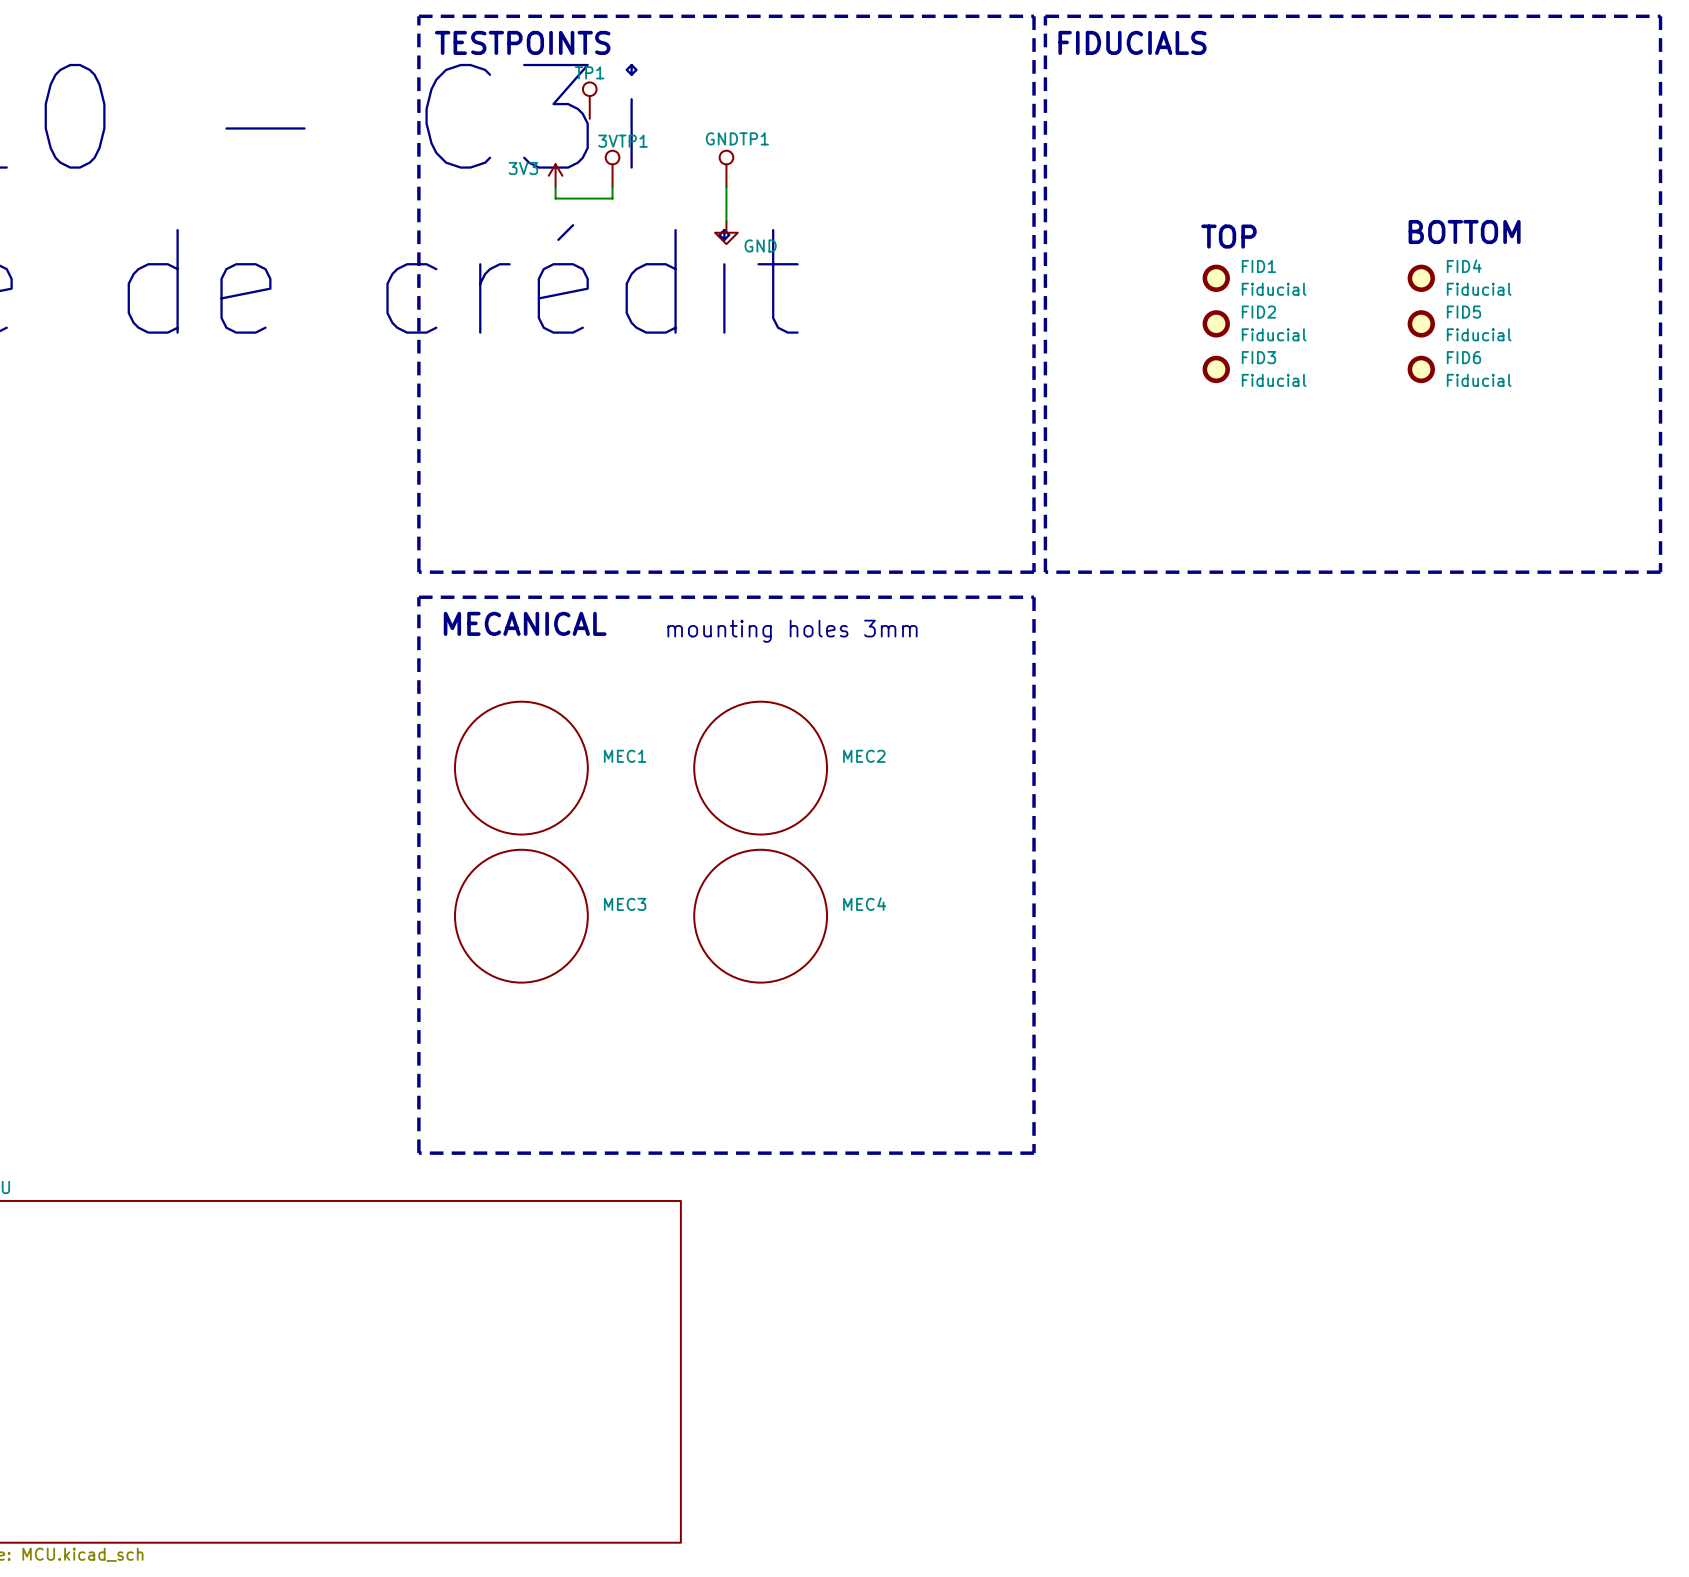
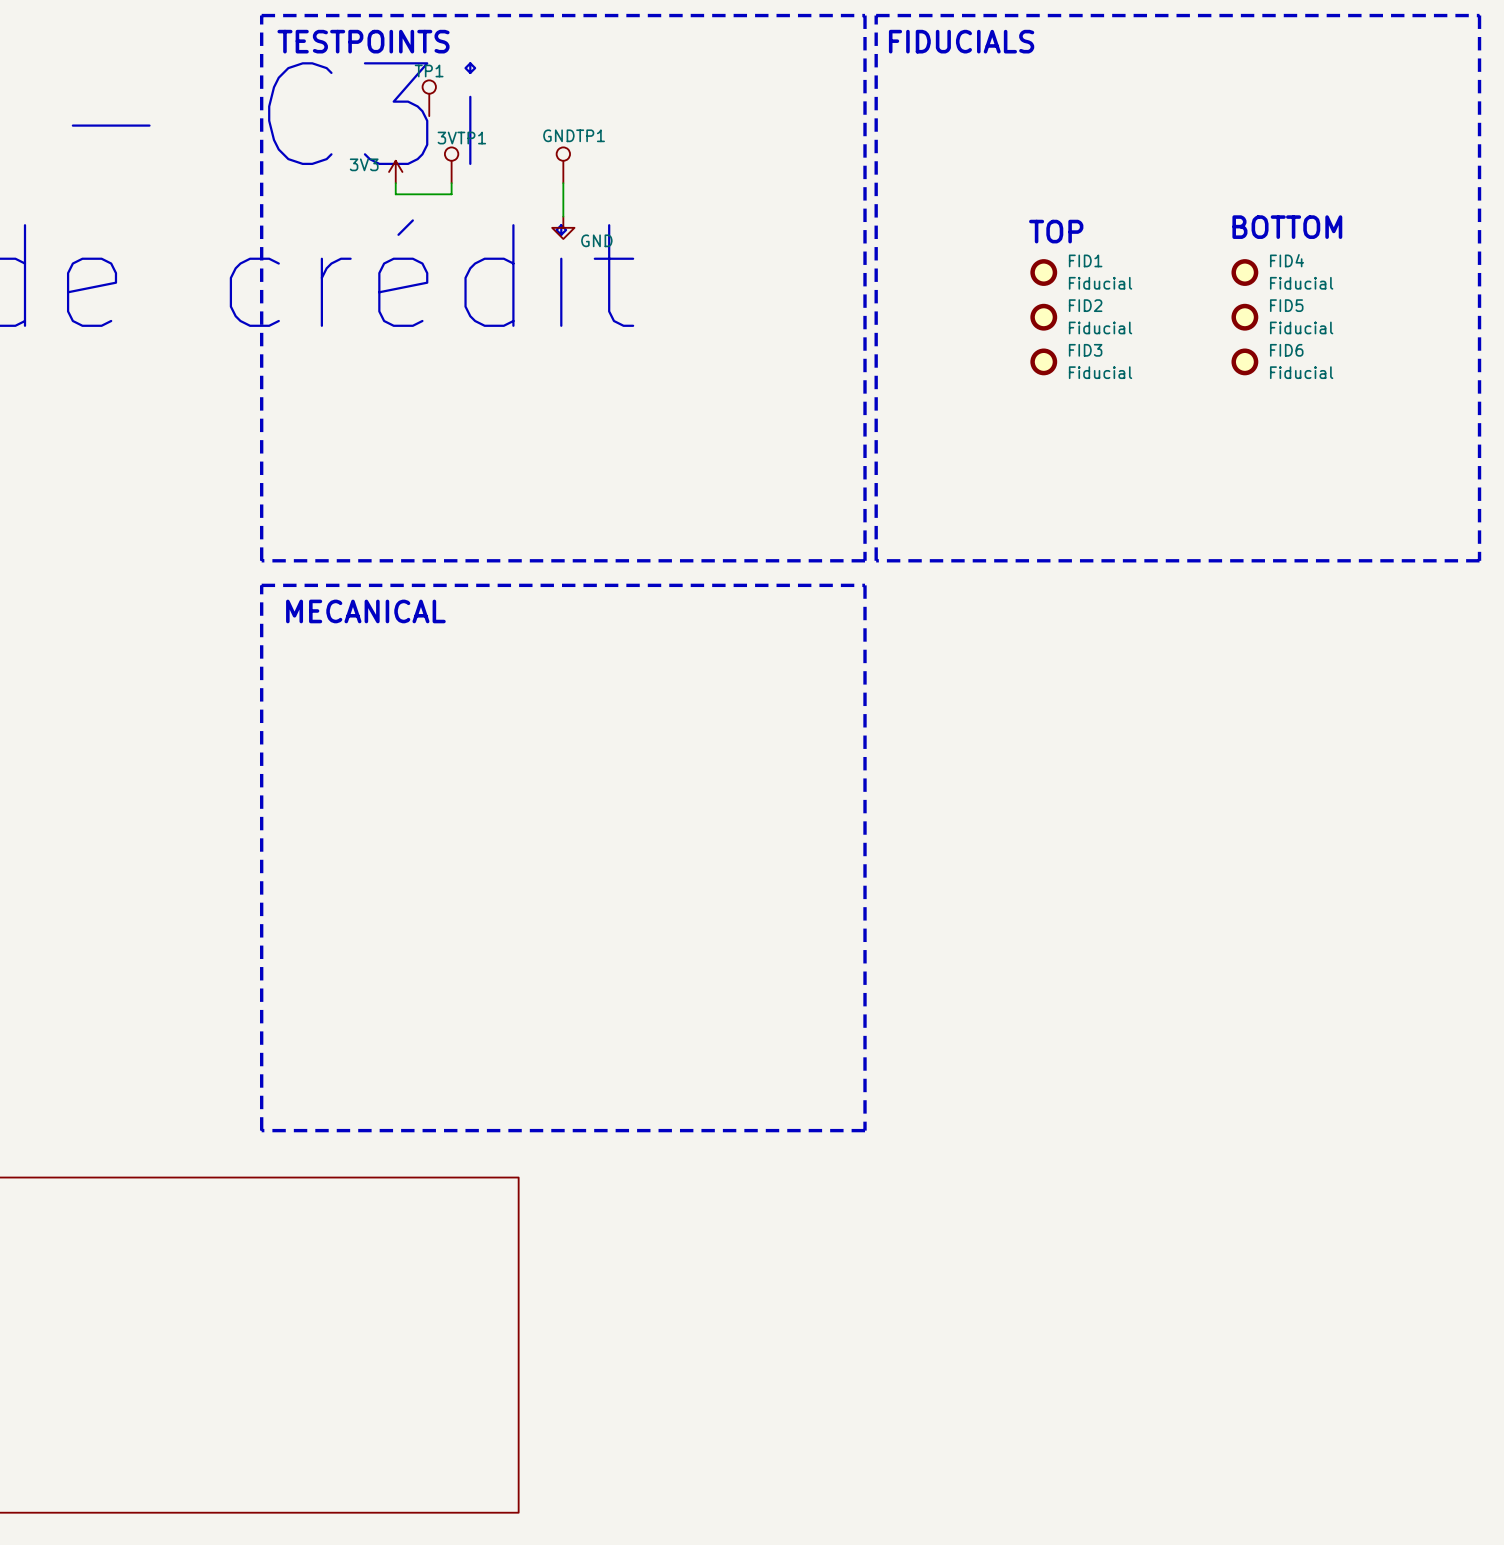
text: mounting holes 3mm (792, 631) -> none
MEC1: (521, 768) -> none
MEC2: (760, 768) -> none
MEC3: (521, 916) -> none
MEC4: (760, 916) -> none

